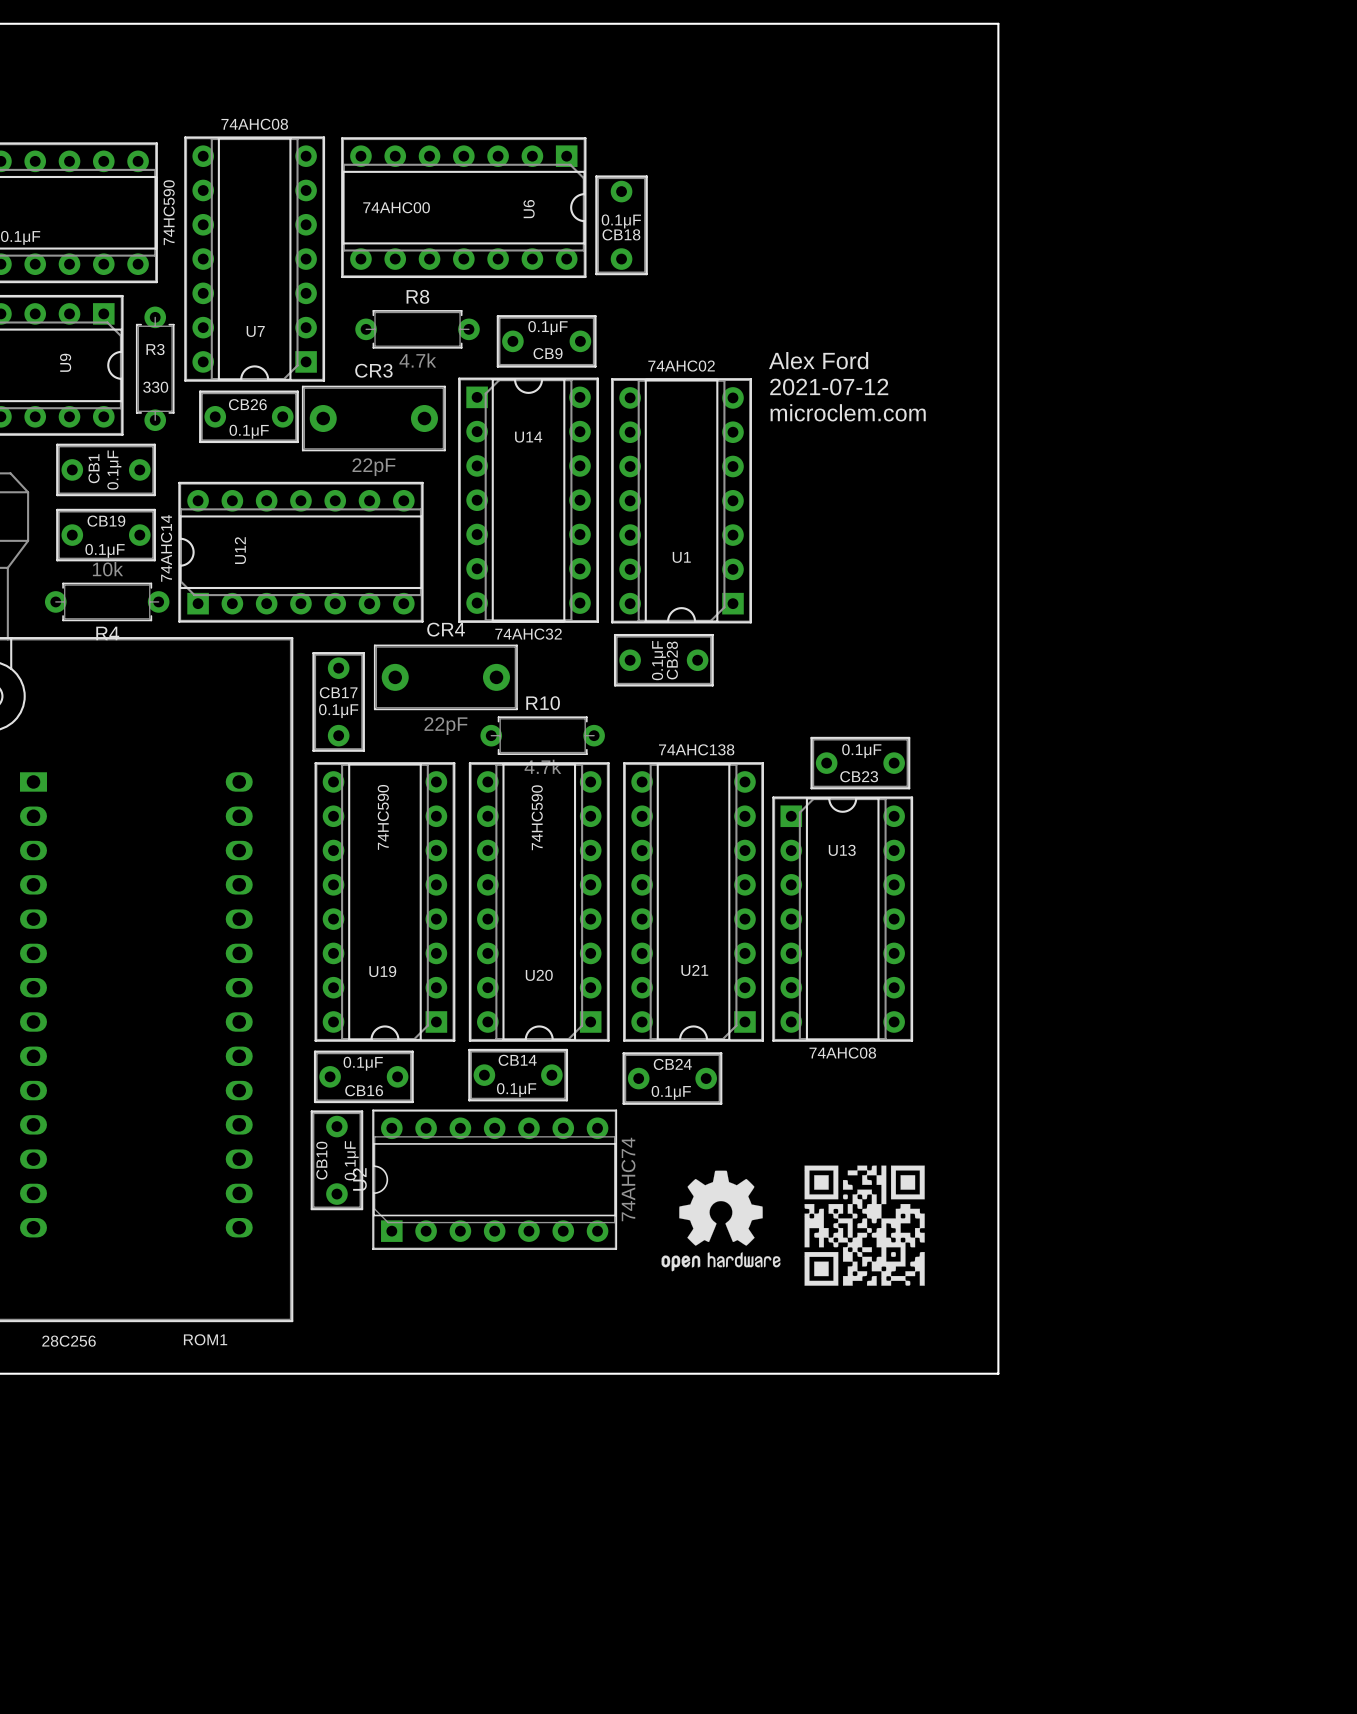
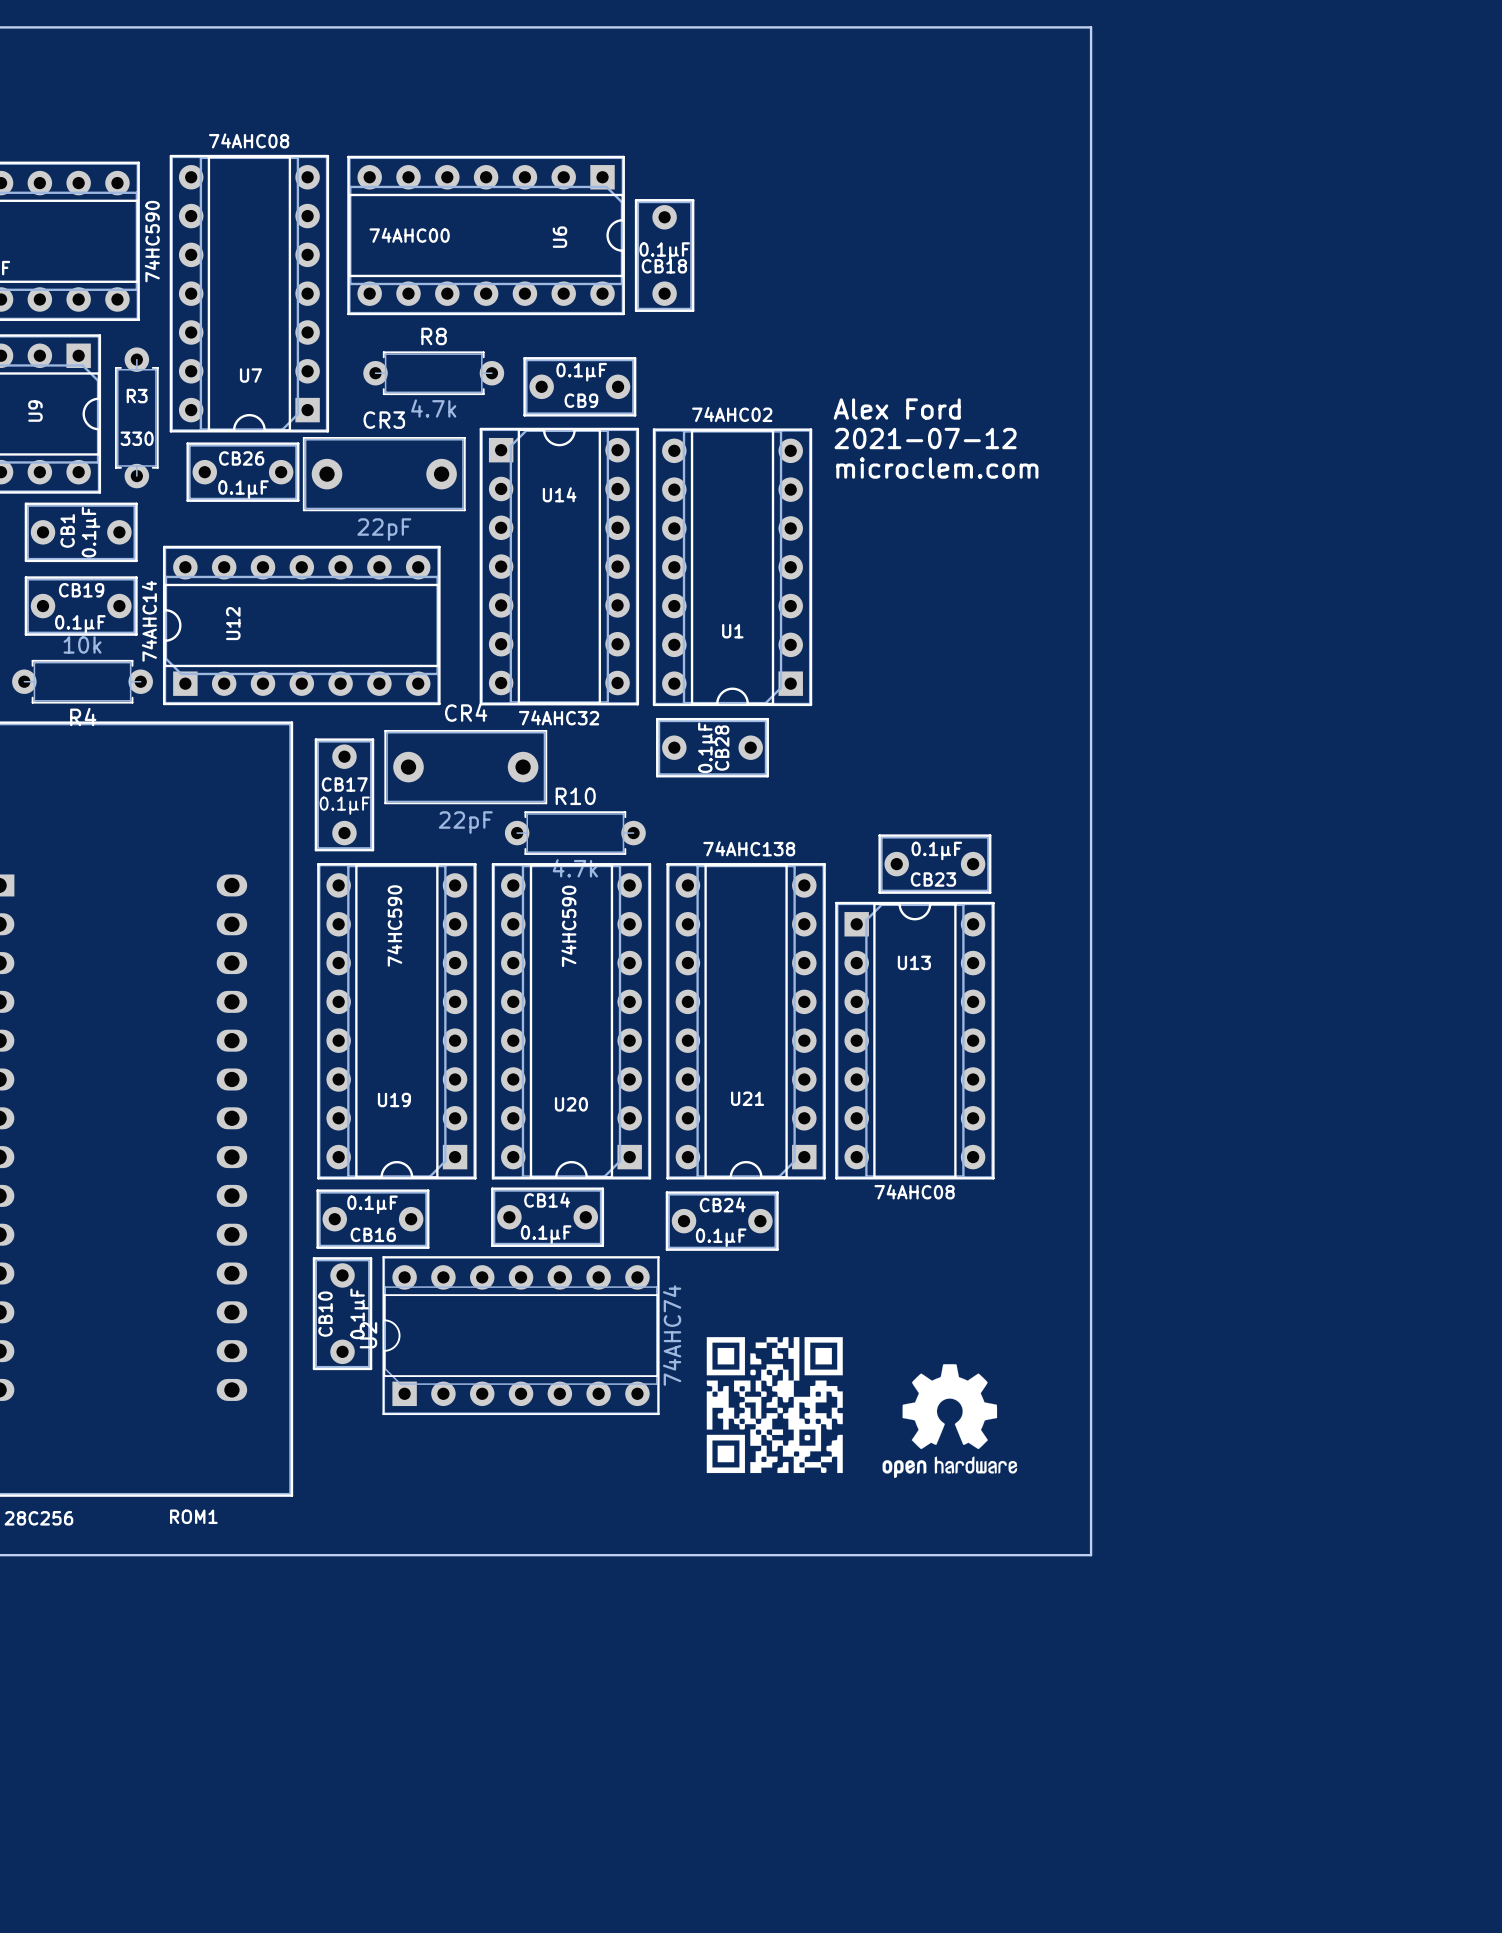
drawing position: (720, 1220) -> (949, 1421)
drawing position: (864, 1225) -> (774, 1405)

